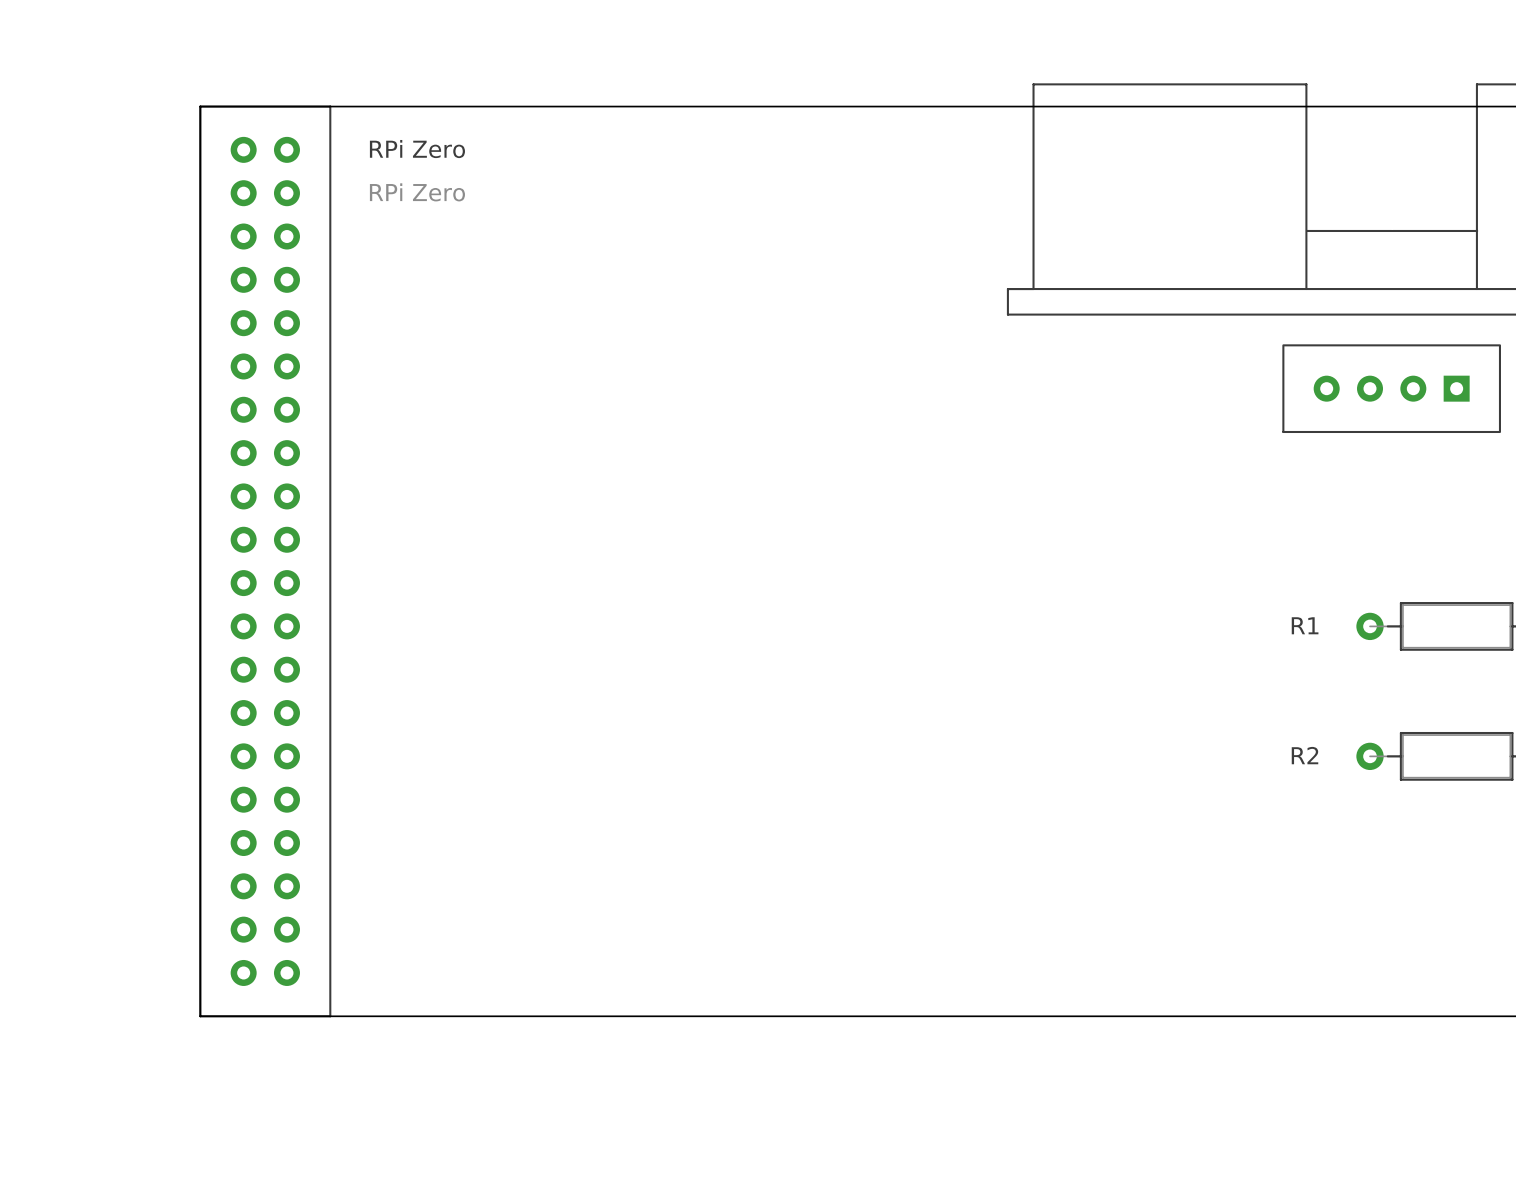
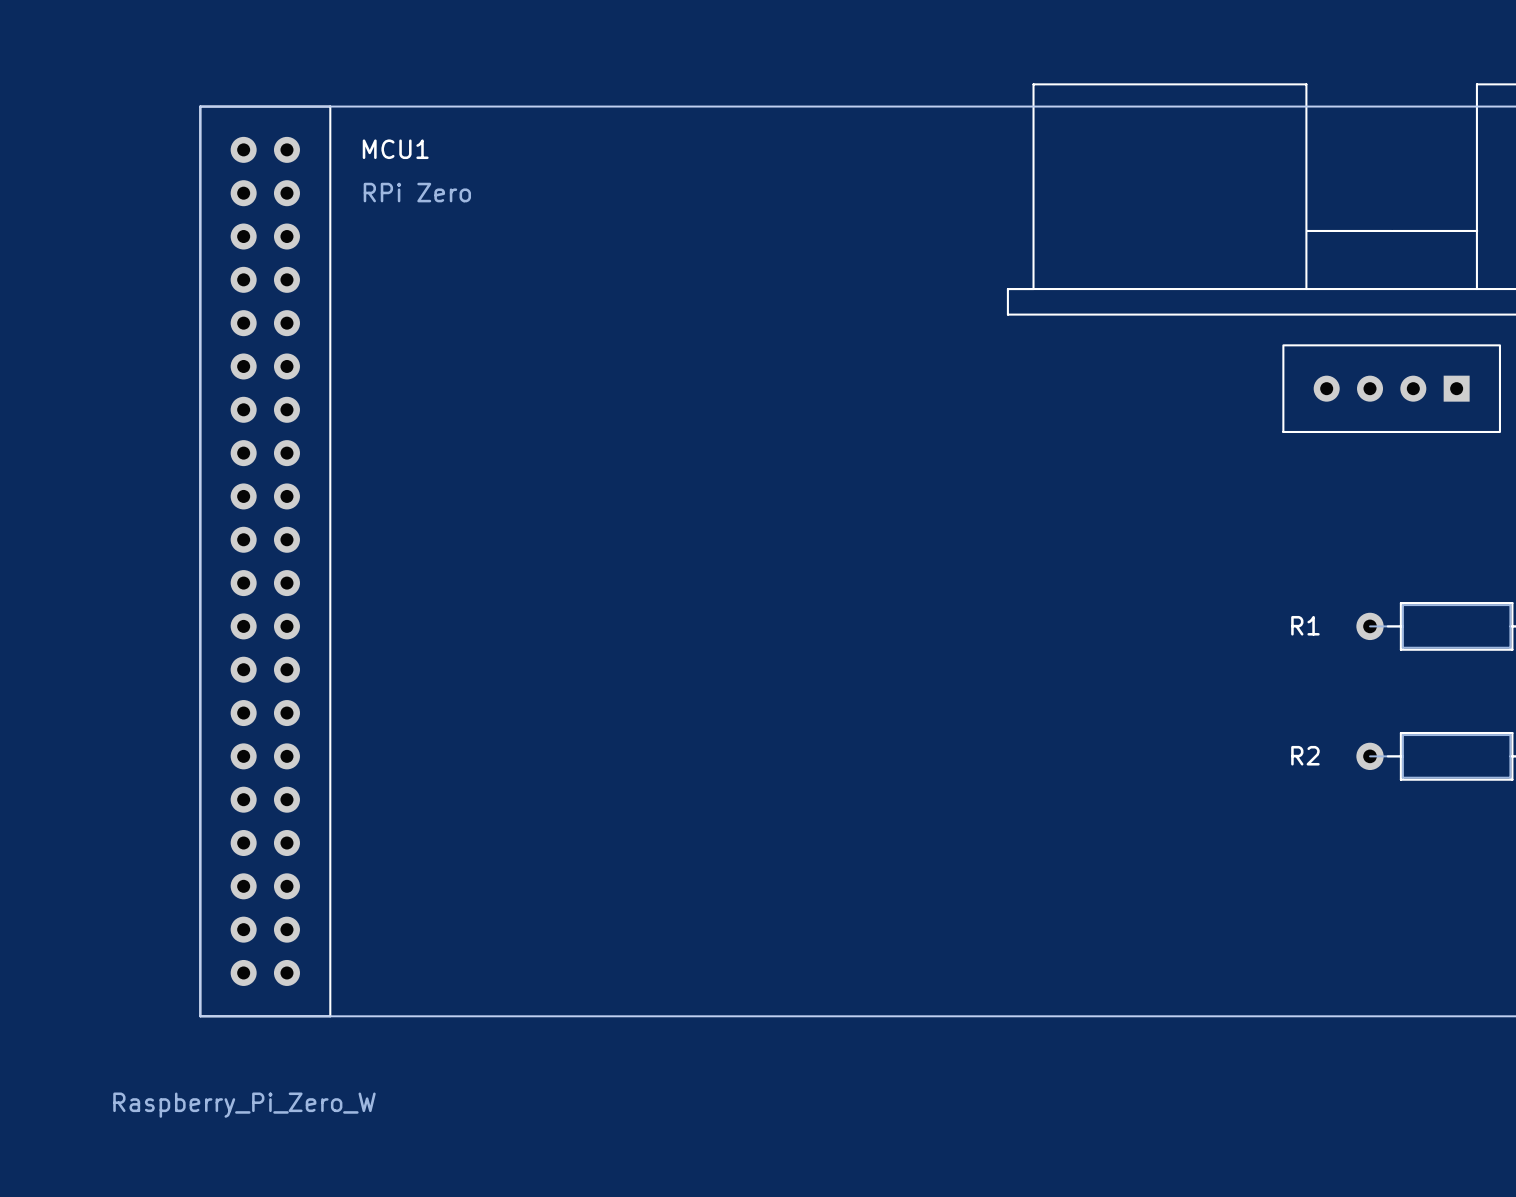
RPi Zero name: RPi Zero (417, 149) -> MCU1 (395, 149)
RPi Zero value: none -> Raspberry_Pi_Zero_W (244, 1105)

